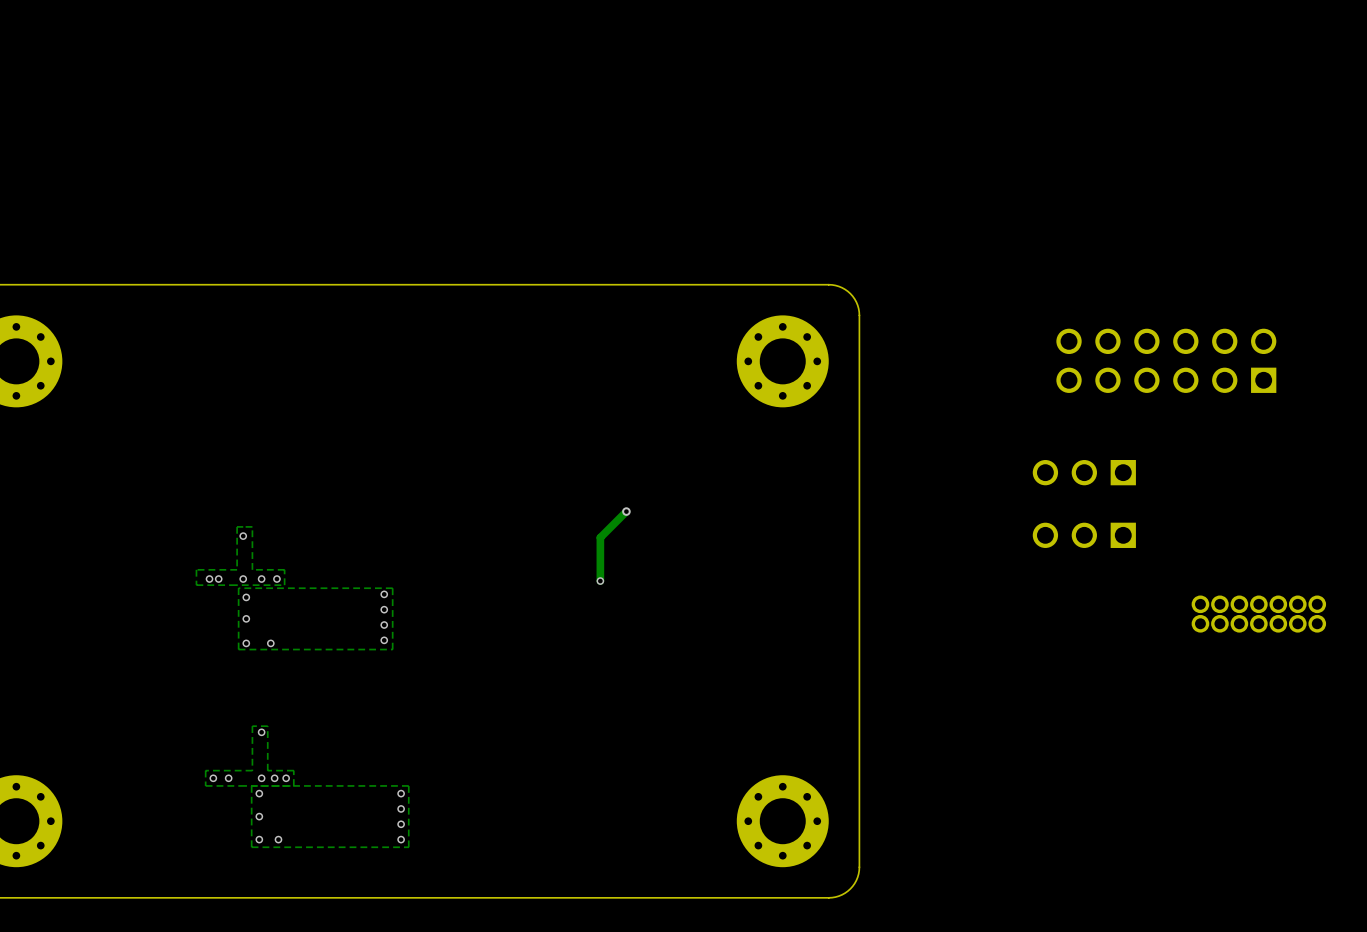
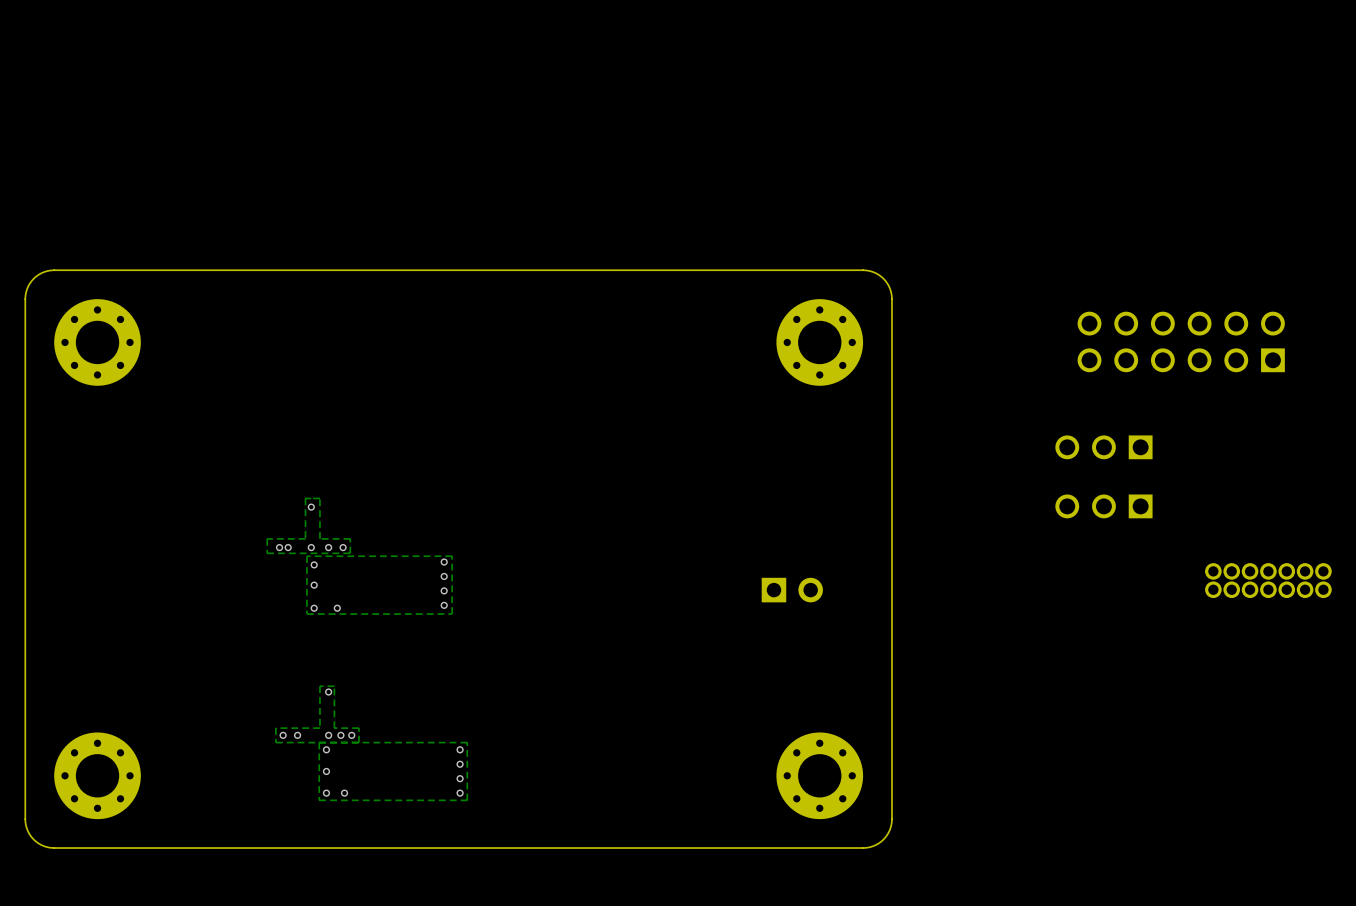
track: (626, 511) (600, 537) (600, 581) -> none
via: (626, 511) -> none
via: (600, 581) -> none
part: none -> (792, 590)

